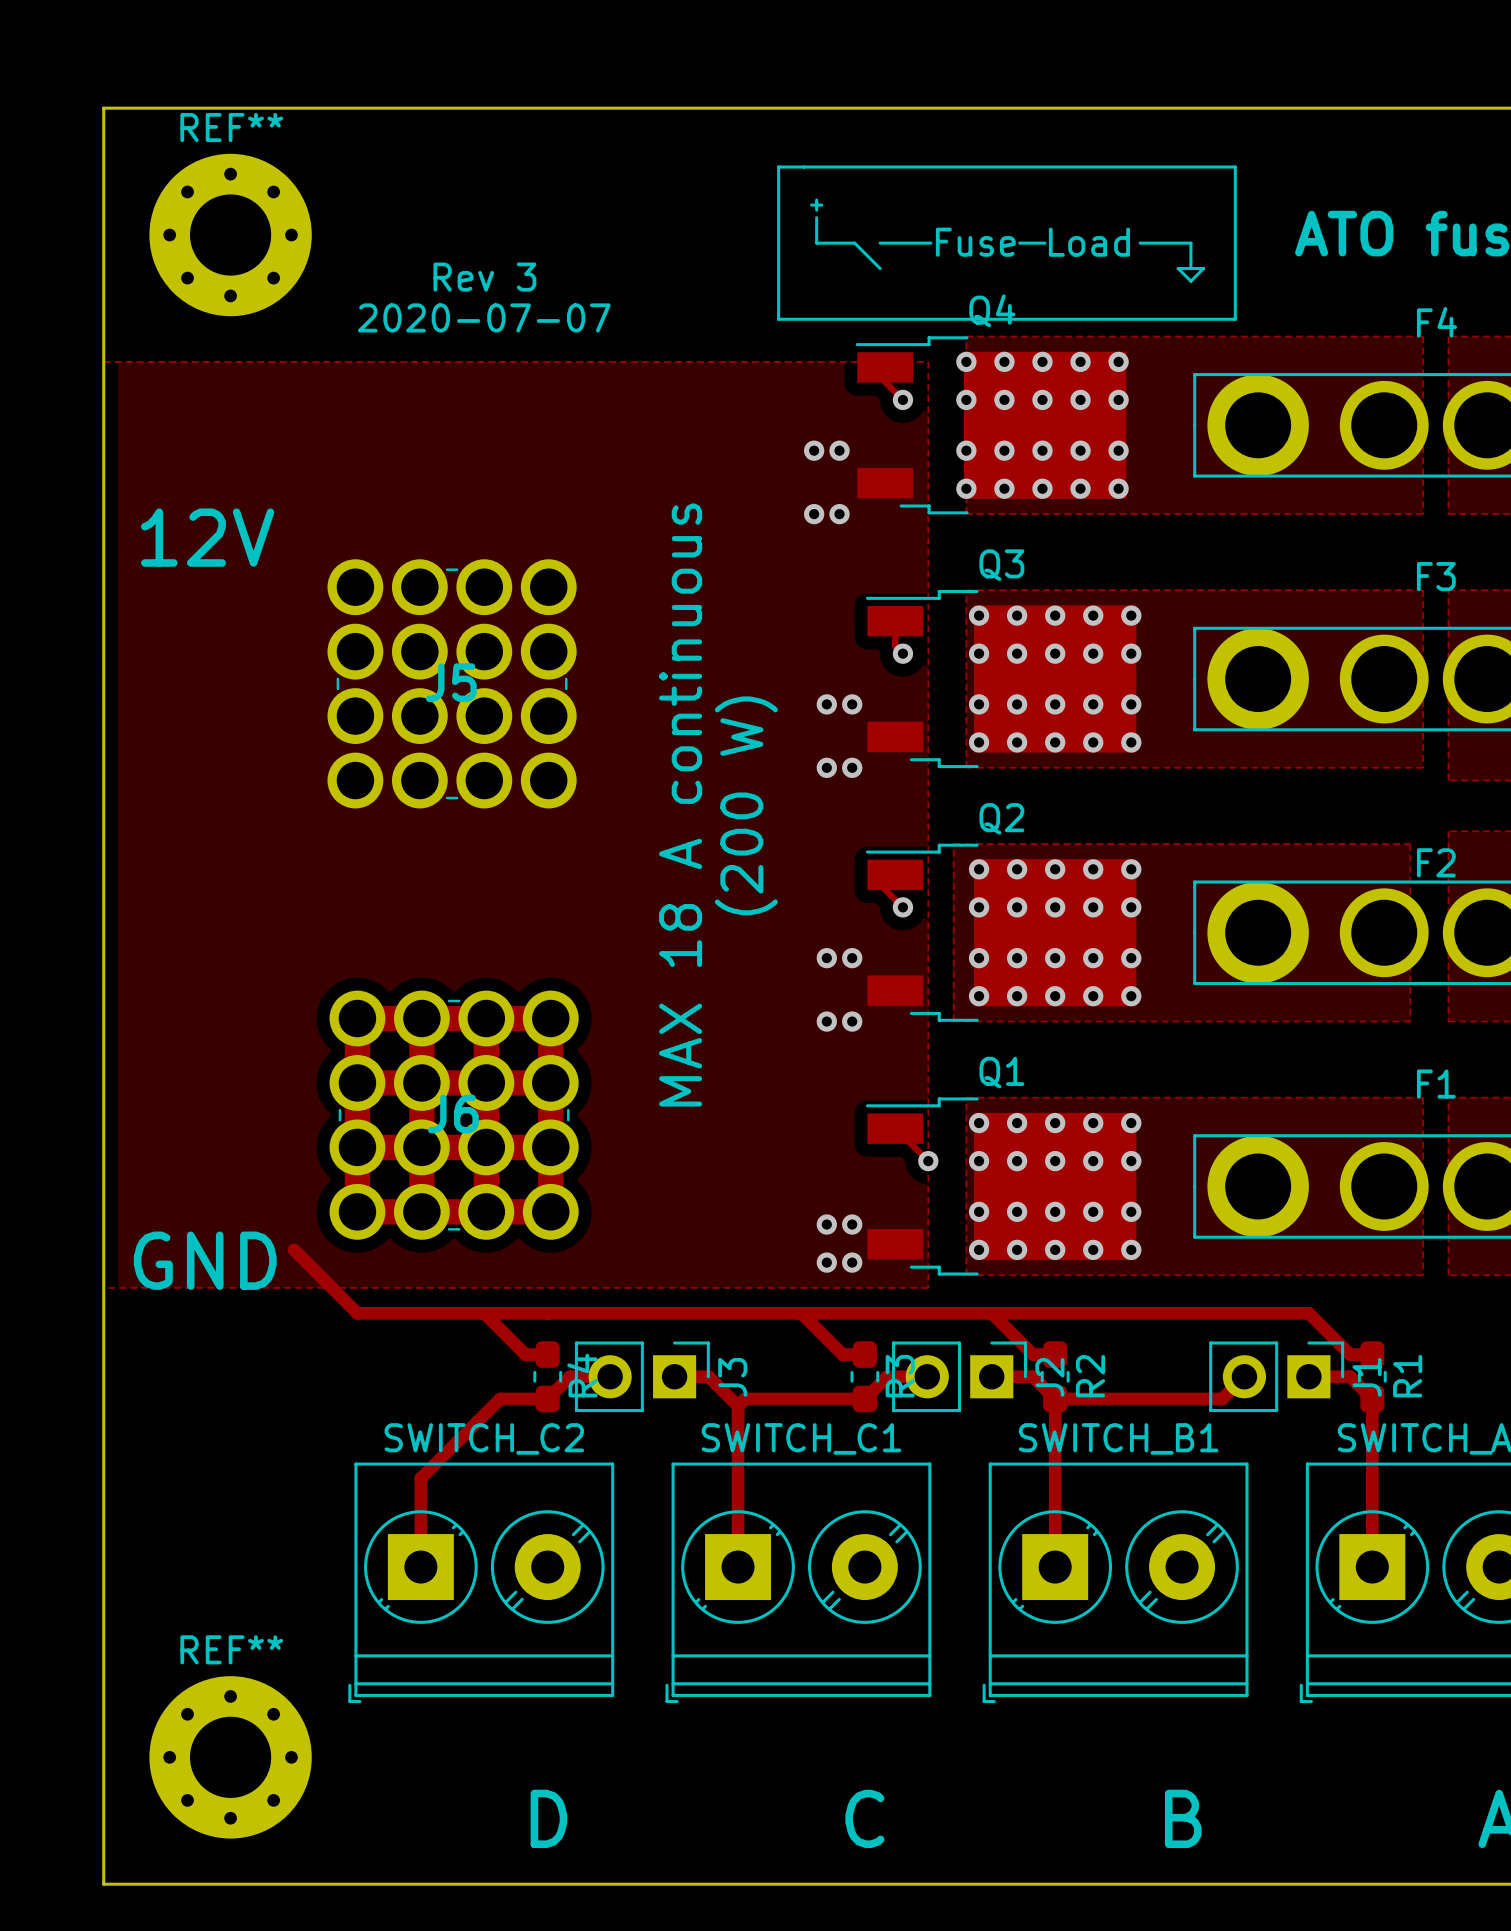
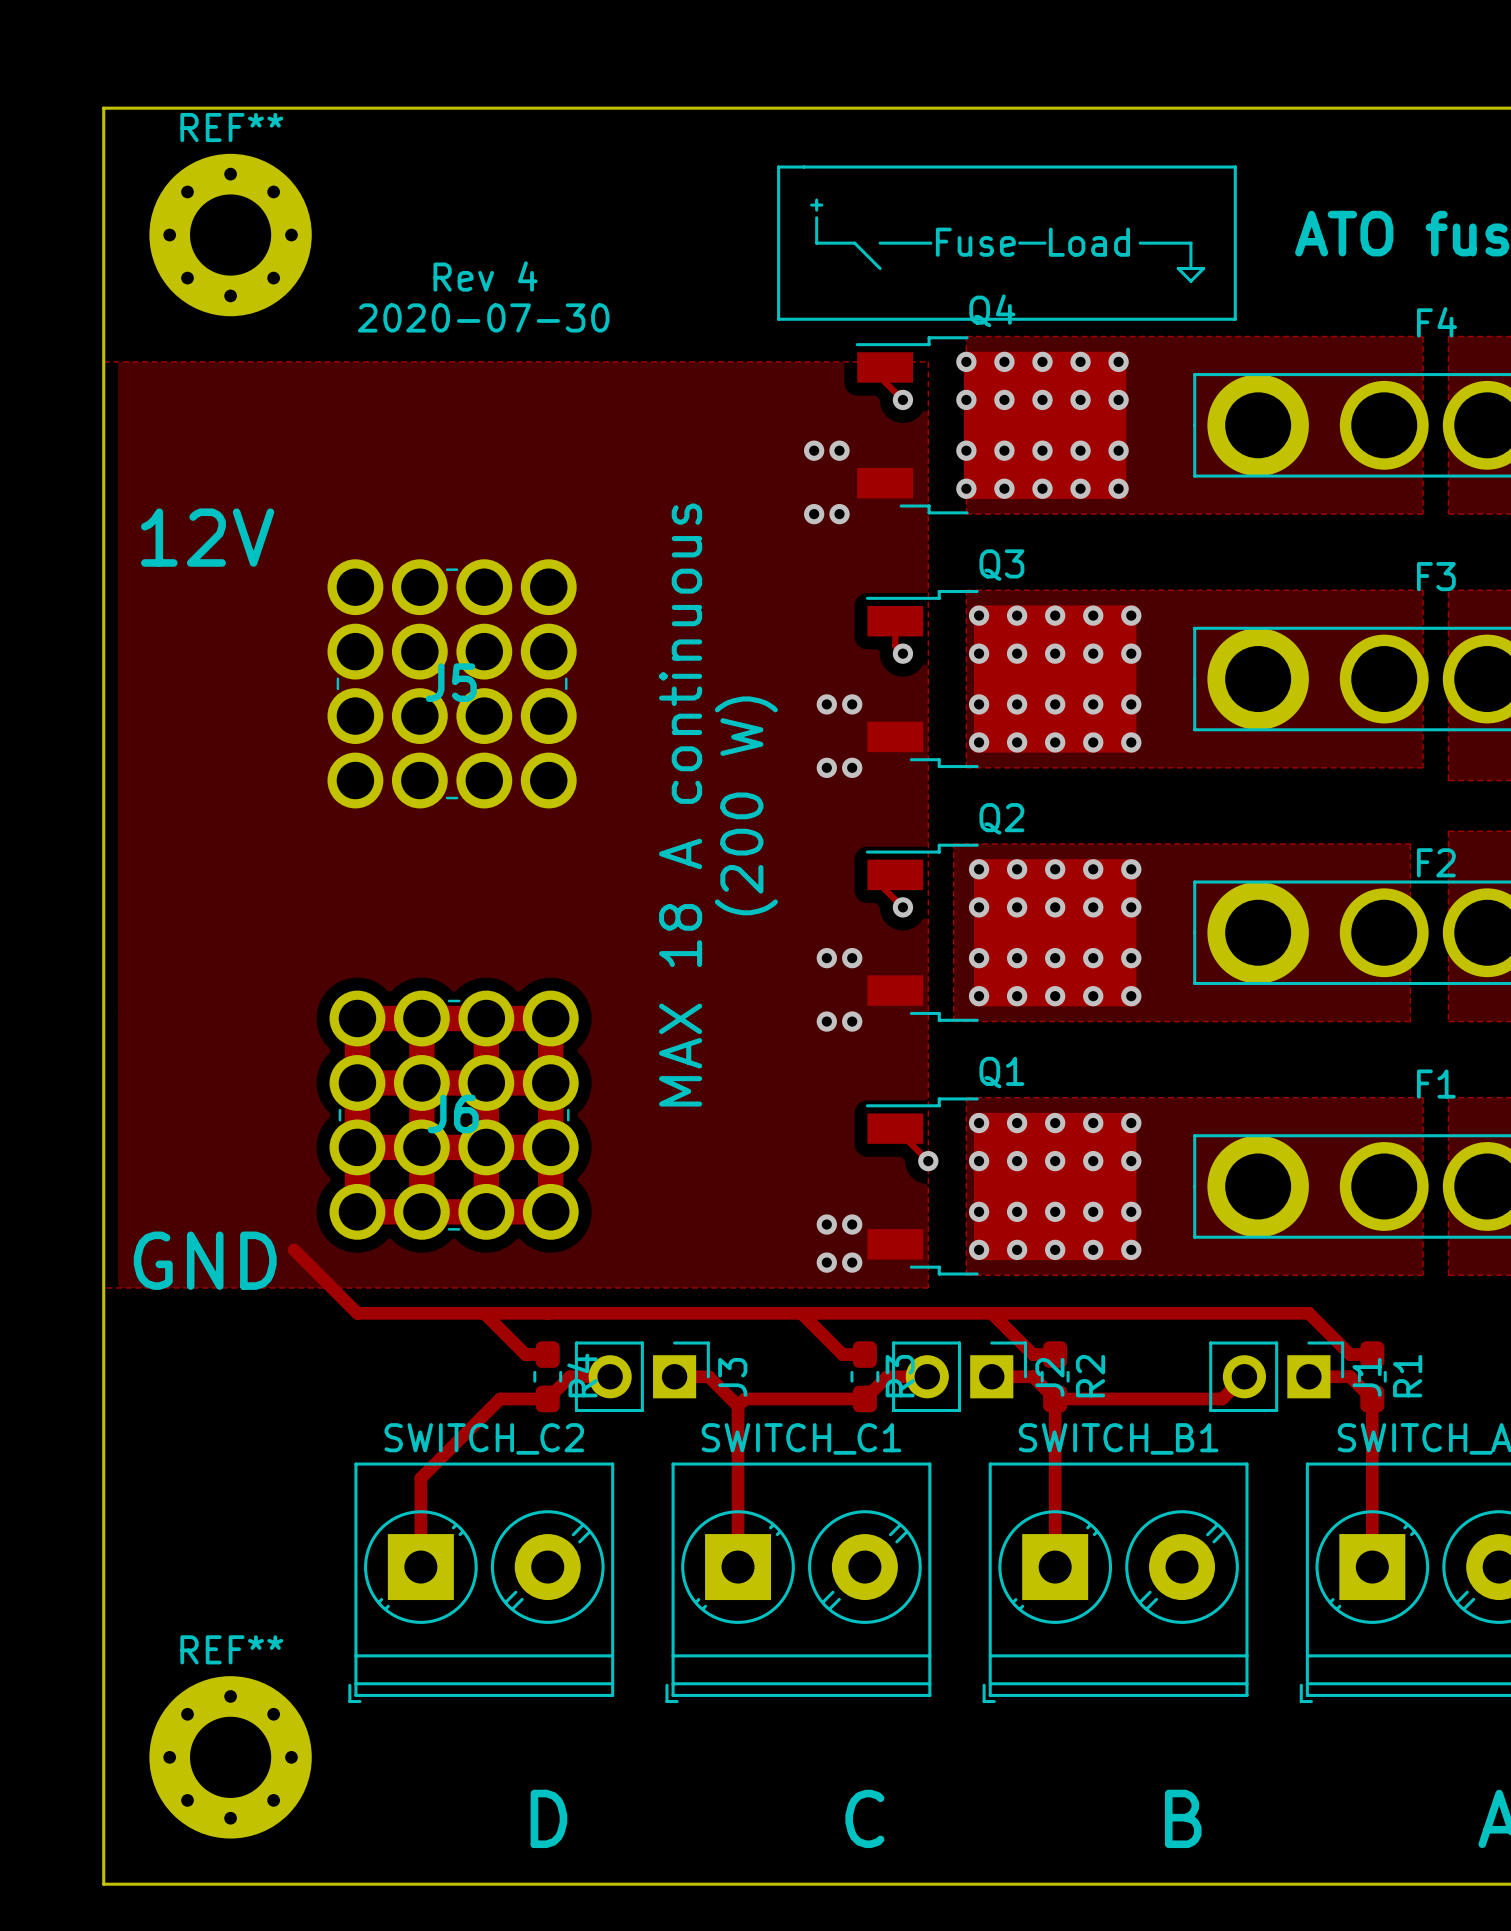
text: Rev 3 (484, 277) -> Rev 4 (485, 276)
text: 2020-07-07 (484, 317) -> 2020-07-30 (483, 317)

